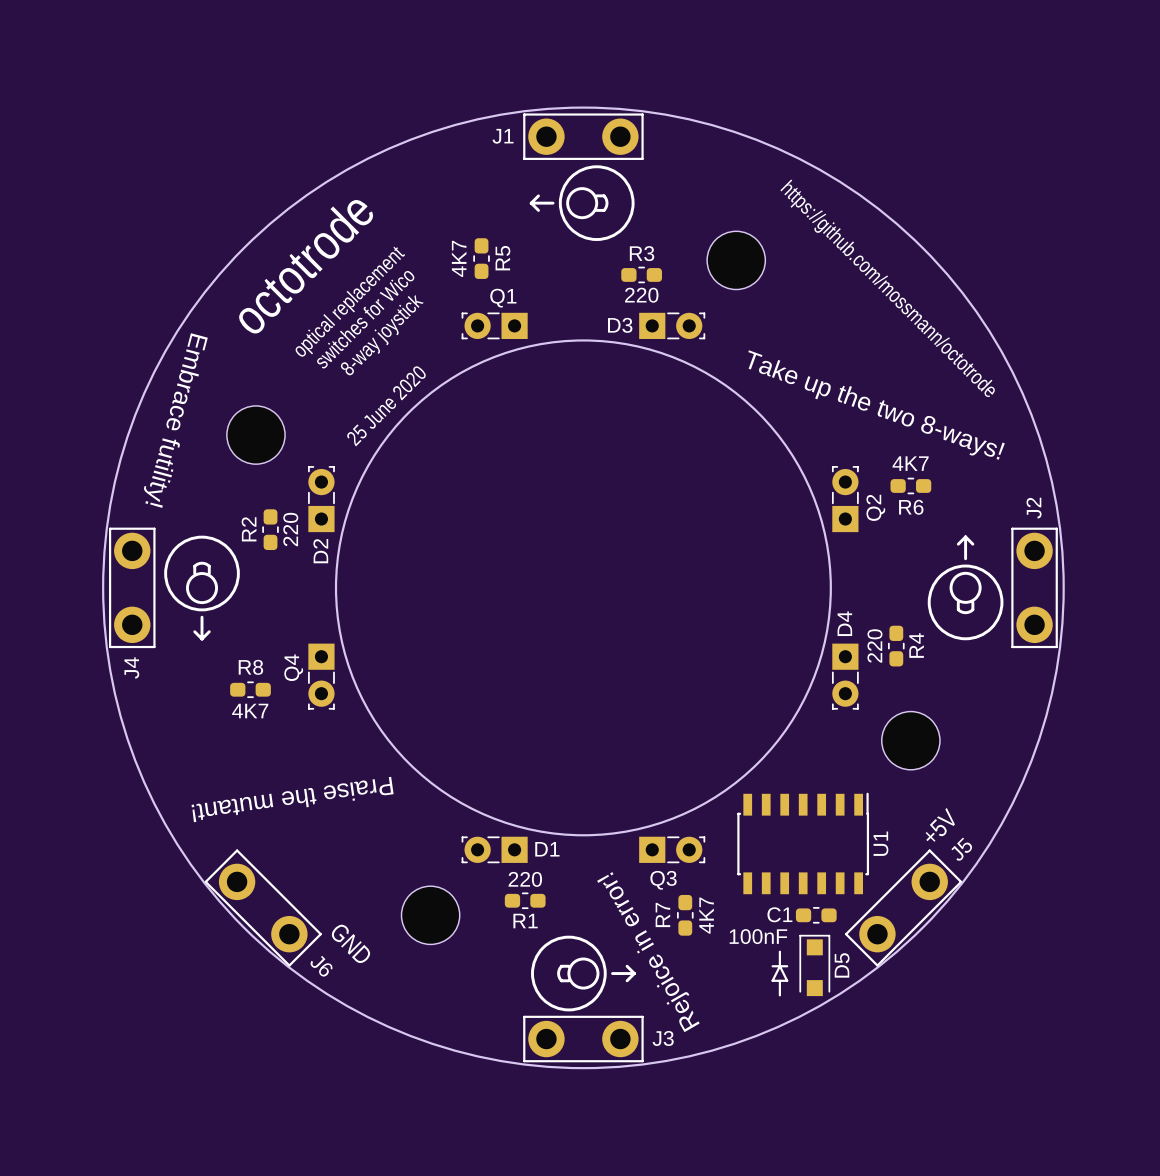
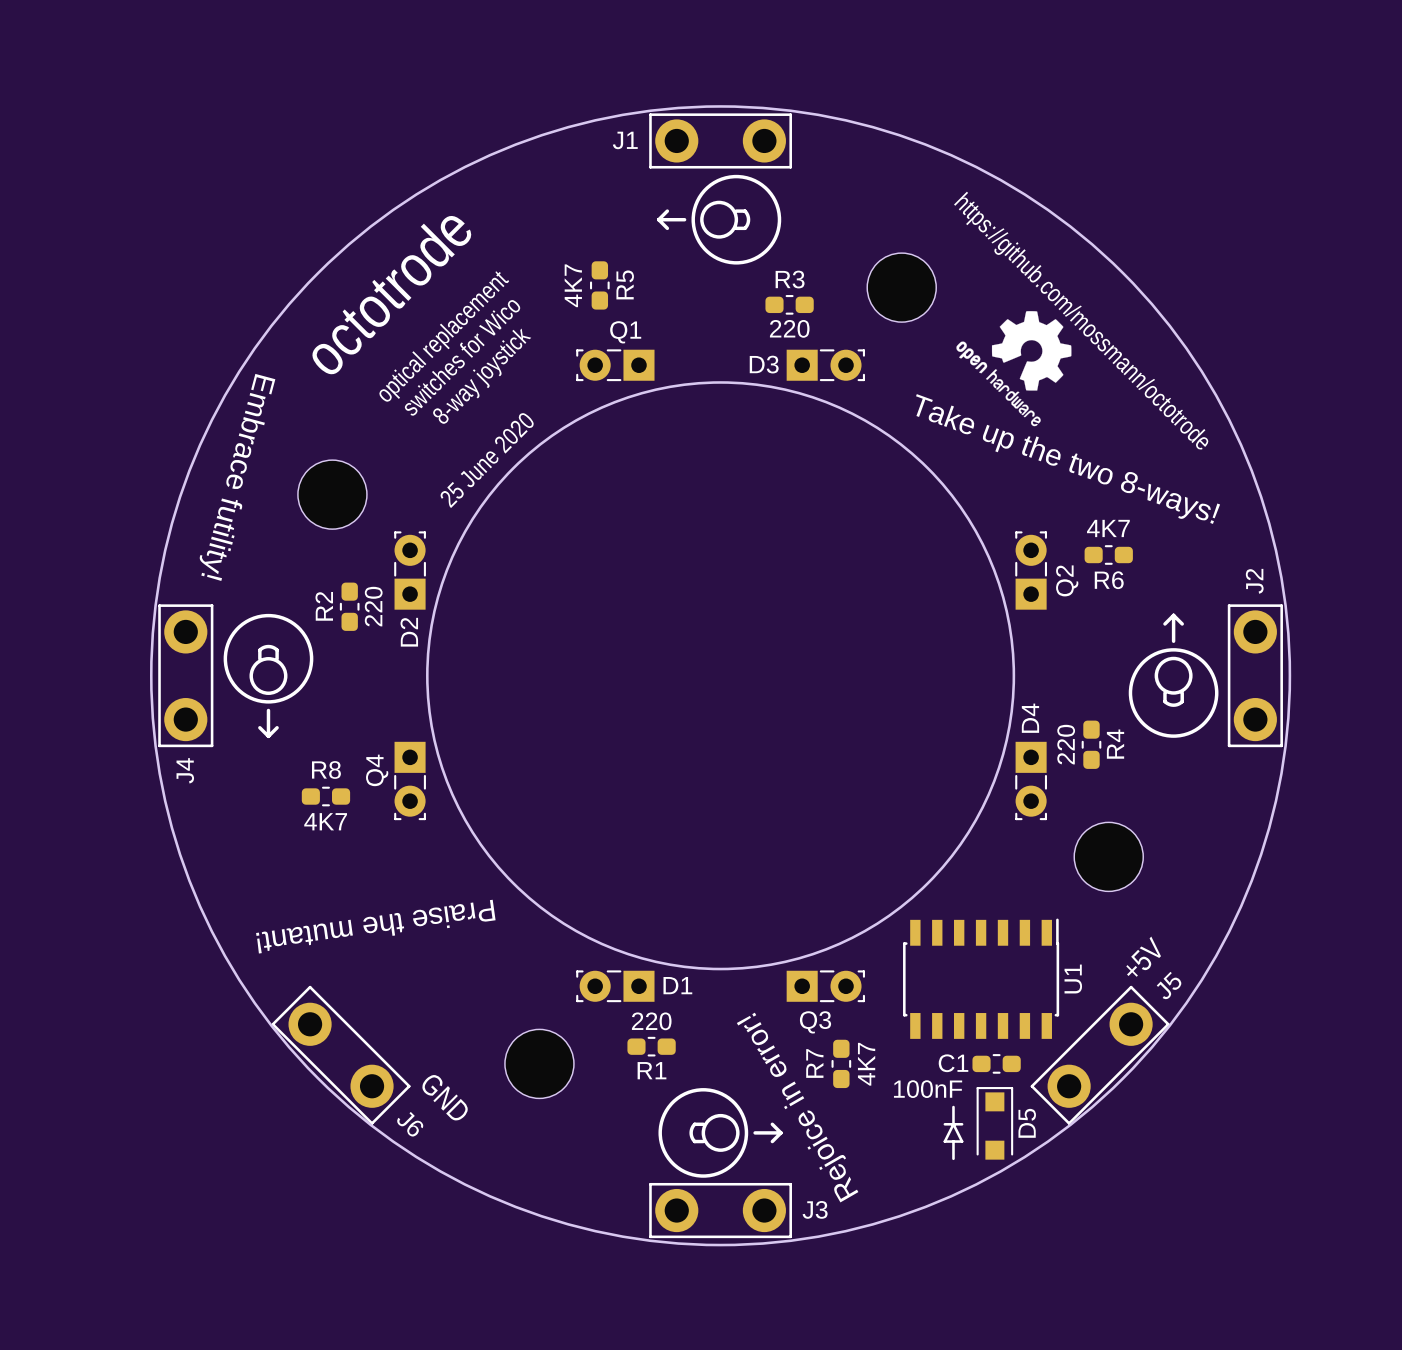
drawing: none -> [956, 311, 1072, 427]

